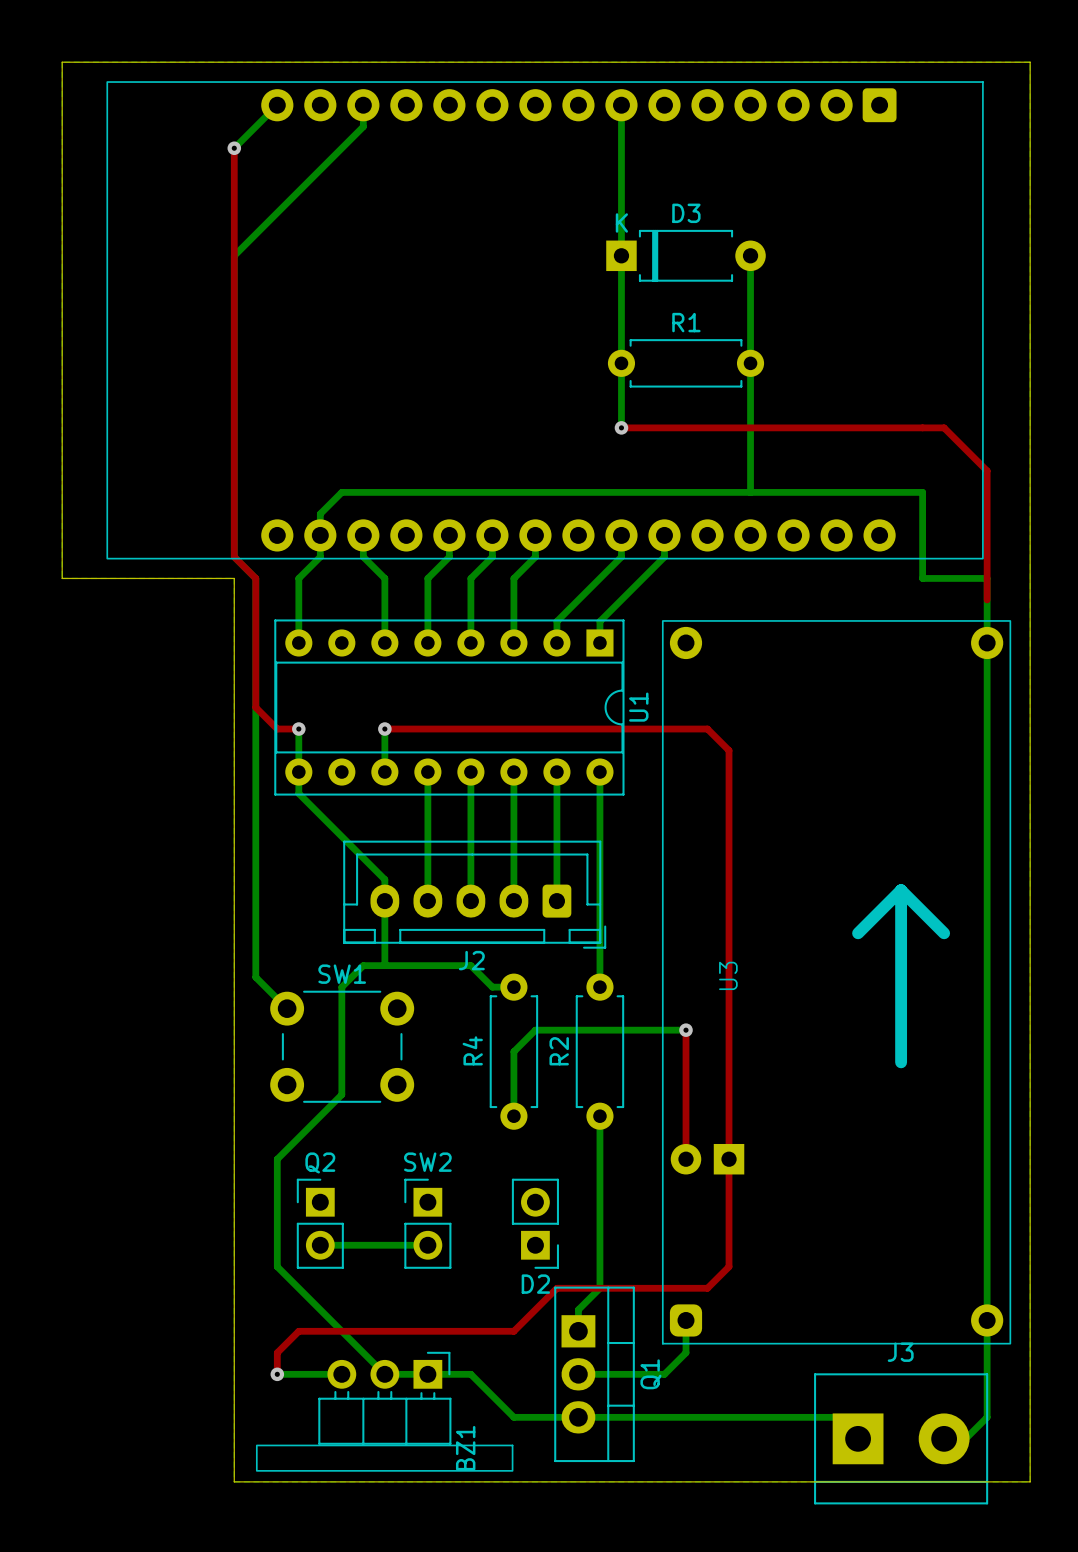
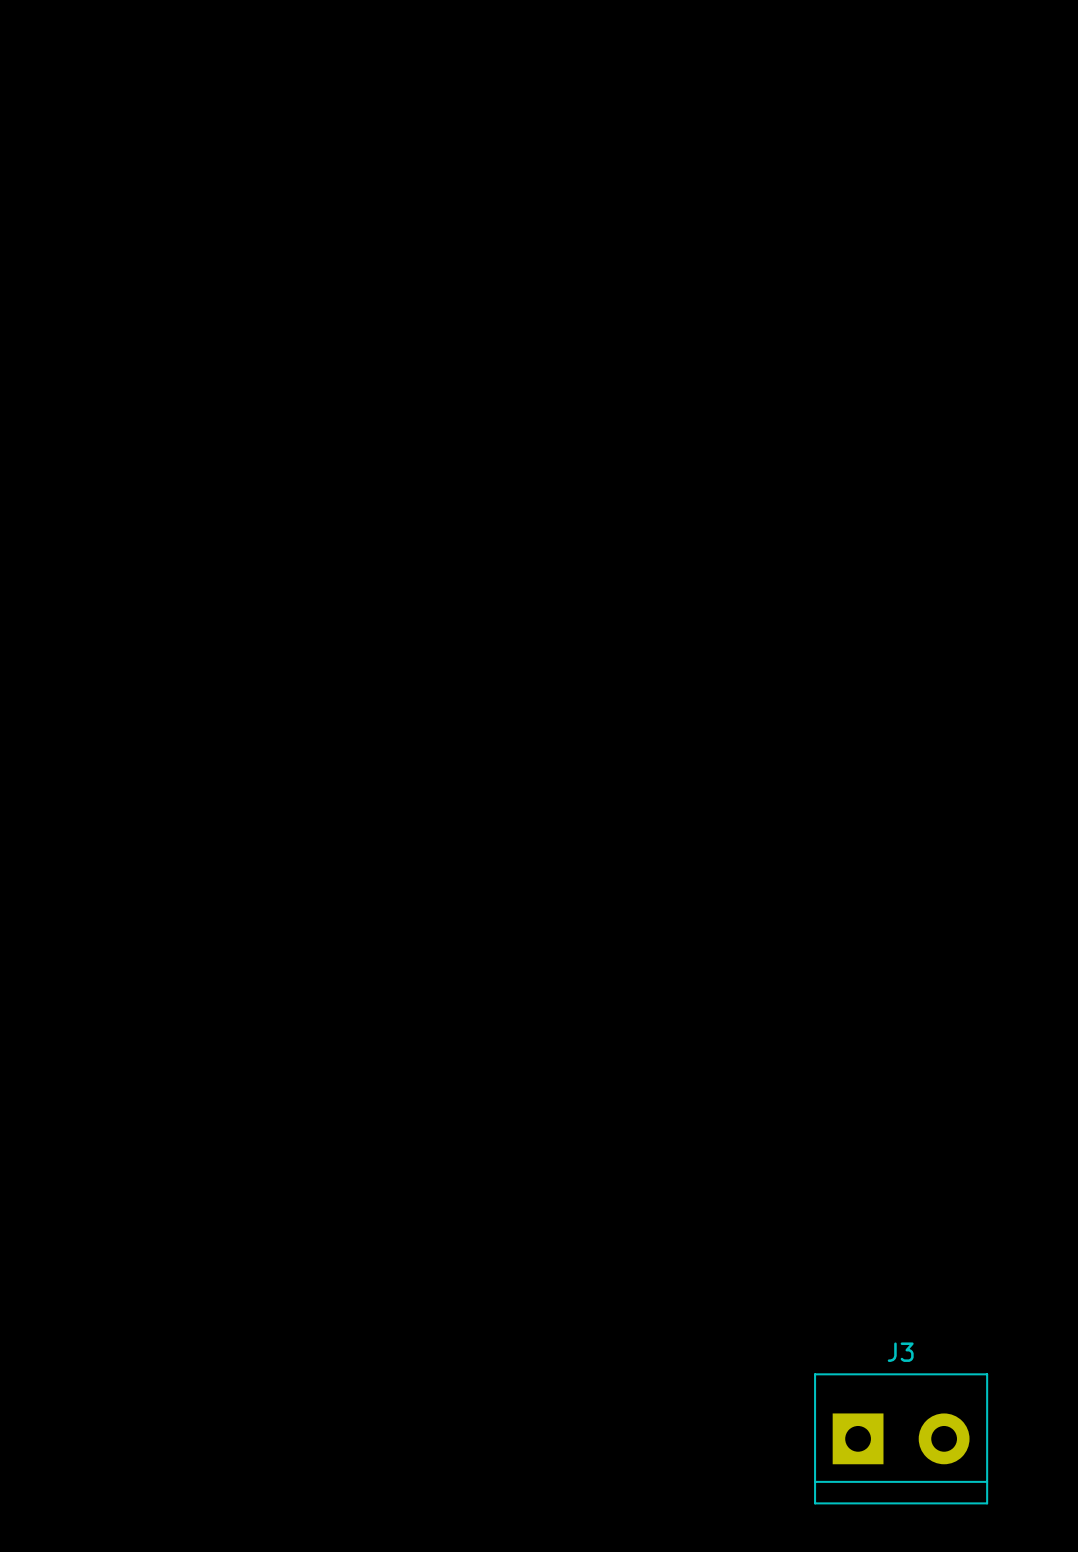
board edge: (62, 62) (62, 578) (234, 578) (234, 1481) (1030, 1481) (1030, 62) (62, 62) -> none
bottom track: (277, 105) (234, 148) -> none
bottom track: (363, 105) (363, 126) (234, 255) (234, 556) (255, 578) (255, 977) (287, 1008) -> none
bottom track: (621, 105) (621, 427) -> none
top track: (234, 148) (234, 556) (255, 578) (255, 707) (277, 729) (298, 729) -> none
via: (234, 148) -> none
D3: (686, 255) -> none
bottom track: (750, 255) (750, 492) -> none
part: (545, 320) -> none
R1: (686, 363) -> none
top track: (621, 427) (944, 427) (987, 470) (987, 599) -> none
via: (621, 427) -> none
bottom track: (363, 535) (363, 556) (384, 578) (384, 642) -> none
bottom track: (449, 535) (449, 556) (427, 578) (427, 642) -> none
bottom track: (492, 535) (492, 556) (470, 578) (470, 642) -> none
bottom track: (535, 535) (535, 556) (513, 578) (513, 642) -> none
bottom track: (621, 535) (621, 556) (556, 621) (556, 642) -> none
bottom track: (664, 535) (664, 556) (599, 621) (599, 642) -> none
bottom track: (298, 642) (298, 578) (320, 556) (320, 513) (341, 492) (922, 492) (922, 578) (987, 578) (987, 1417) (965, 1438) (944, 1438) -> none
U1: (449, 707) -> none
bottom track: (298, 729) (298, 793) (384, 879) (384, 965) -> none
via: (298, 729) -> none
top track: (384, 729) (707, 729) (729, 750) (729, 1266) (707, 1288) (556, 1288) (513, 1331) (298, 1331) (277, 1352) (277, 1374) -> none
bottom track: (384, 729) (384, 772) -> none
via: (384, 729) -> none
bottom track: (427, 772) (427, 901) -> none
bottom track: (470, 772) (470, 901) -> none
bottom track: (513, 772) (513, 901) -> none
bottom track: (556, 772) (556, 901) -> none
bottom track: (599, 772) (599, 987) -> none
J2: (474, 894) -> none
U3: (836, 982) -> none
bottom track: (513, 987) (492, 987) (470, 965) (363, 965) (341, 987) (341, 1094) (277, 1159) (277, 1266) (384, 1374) (470, 1374) (513, 1417) (836, 1417) (858, 1438) -> none
top track: (686, 1030) (686, 1159) -> none
bottom track: (686, 1030) (535, 1030) (513, 1051) (513, 1116) -> none
via: (686, 1030) -> none
SW1: (342, 1046) -> none
R4: (513, 1051) -> none
R2: (599, 1051) -> none
bottom track: (599, 1116) (599, 1288) (578, 1309) (578, 1331) -> none
part: (707, 1159) -> none
Q2: (320, 1223) -> none
SW2: (427, 1223) -> none
D2: (535, 1223) -> none
bottom track: (320, 1245) (427, 1245) -> none
bottom track: (686, 1320) (686, 1352) (664, 1374) (578, 1374) -> none
bottom track: (277, 1374) (341, 1374) -> none
via: (277, 1374) -> none
Q1: (594, 1374) -> none
BZ1: (384, 1411) -> none

